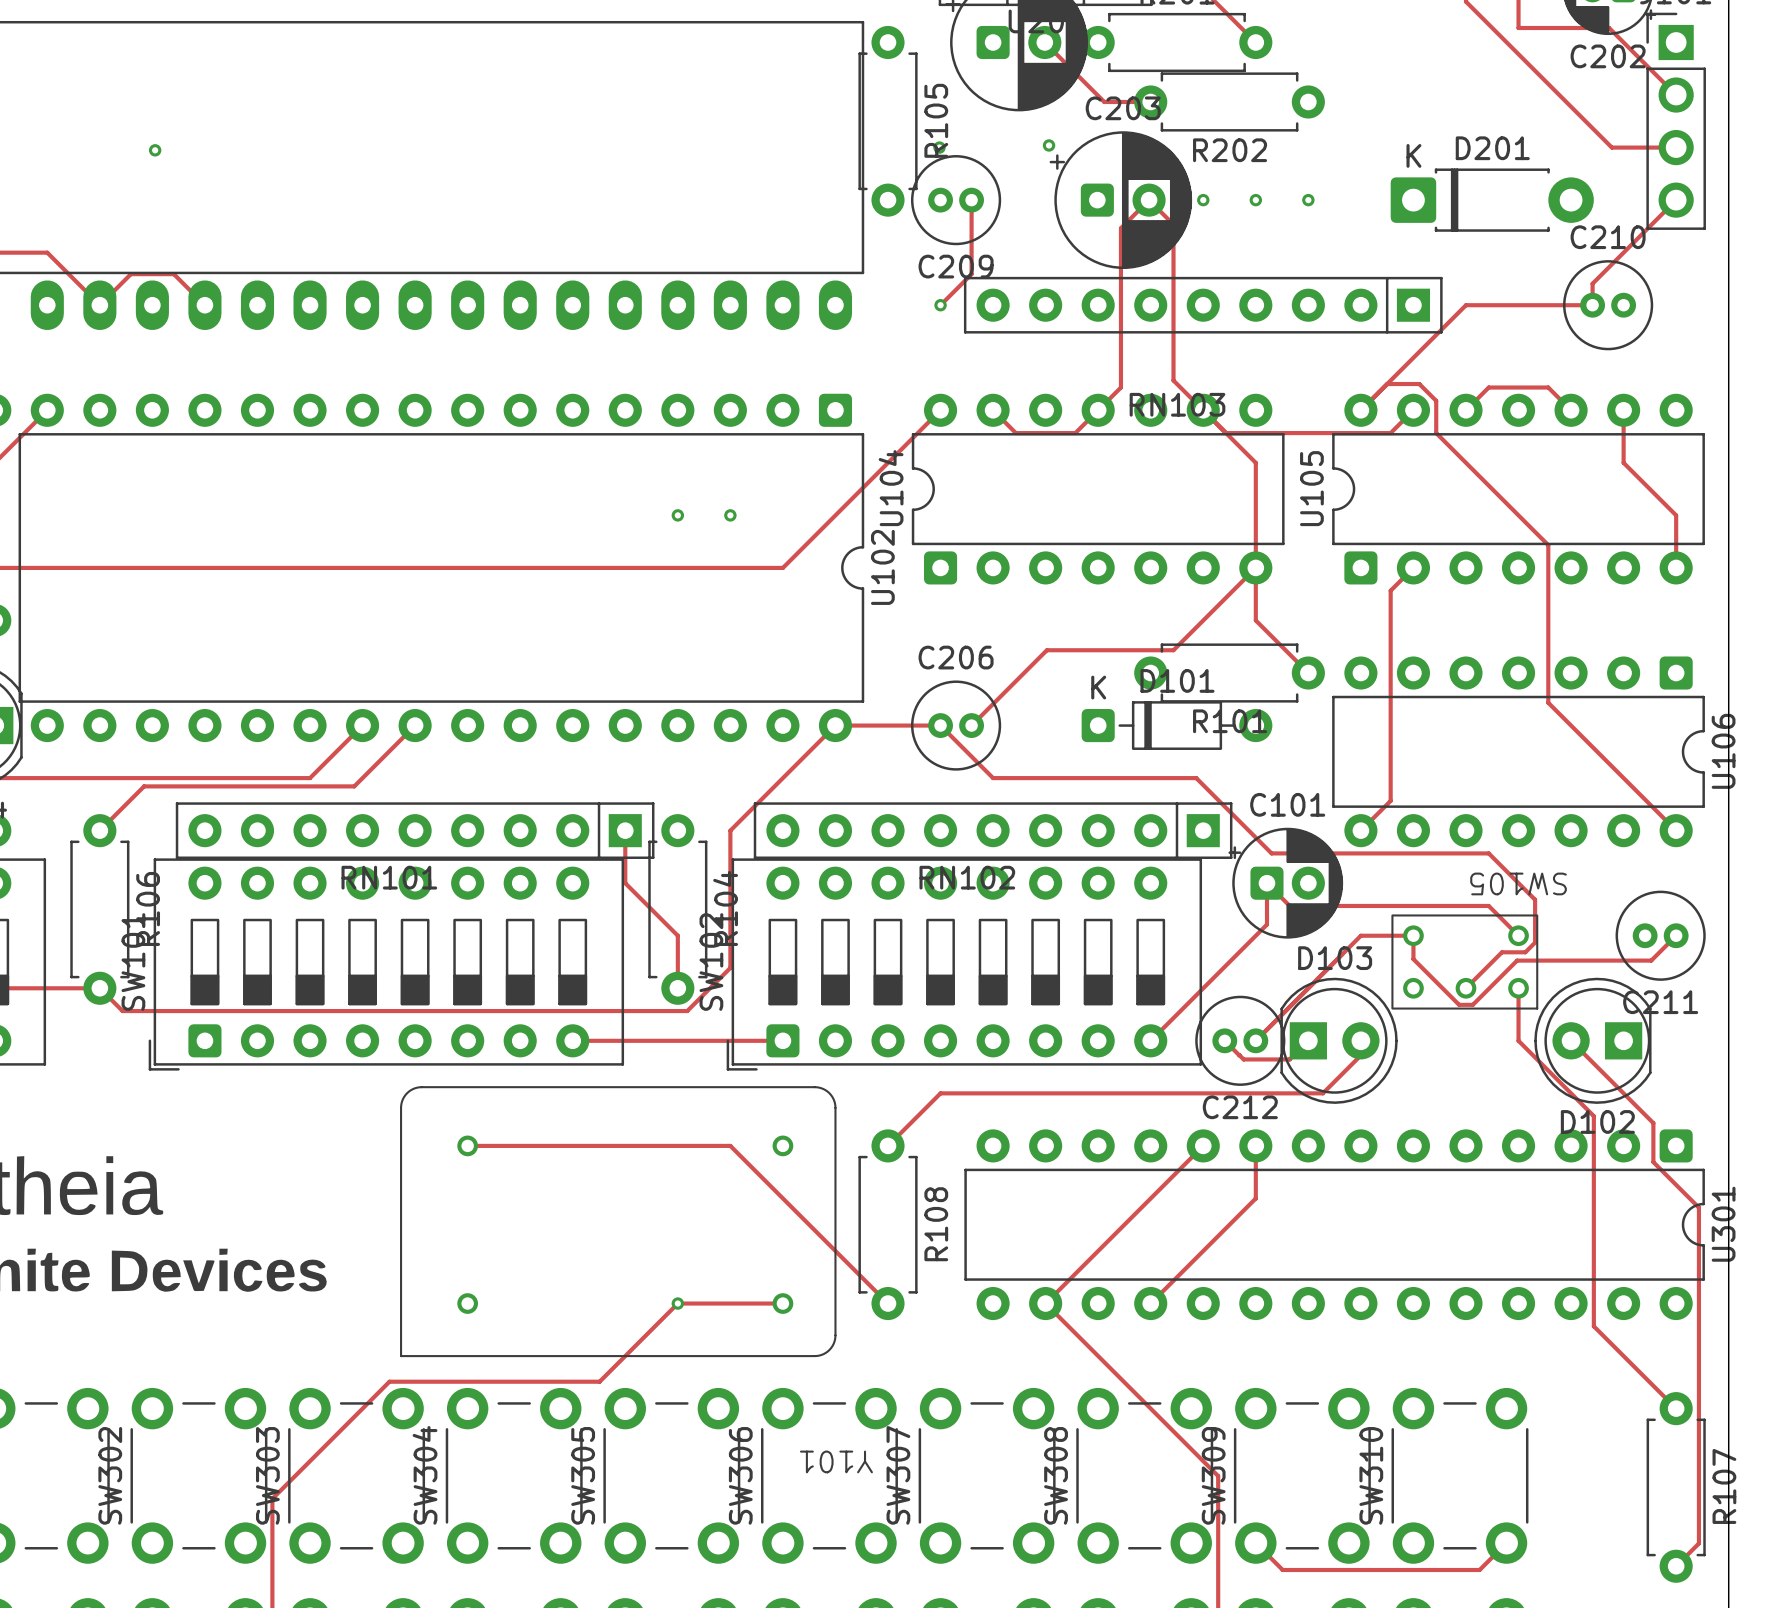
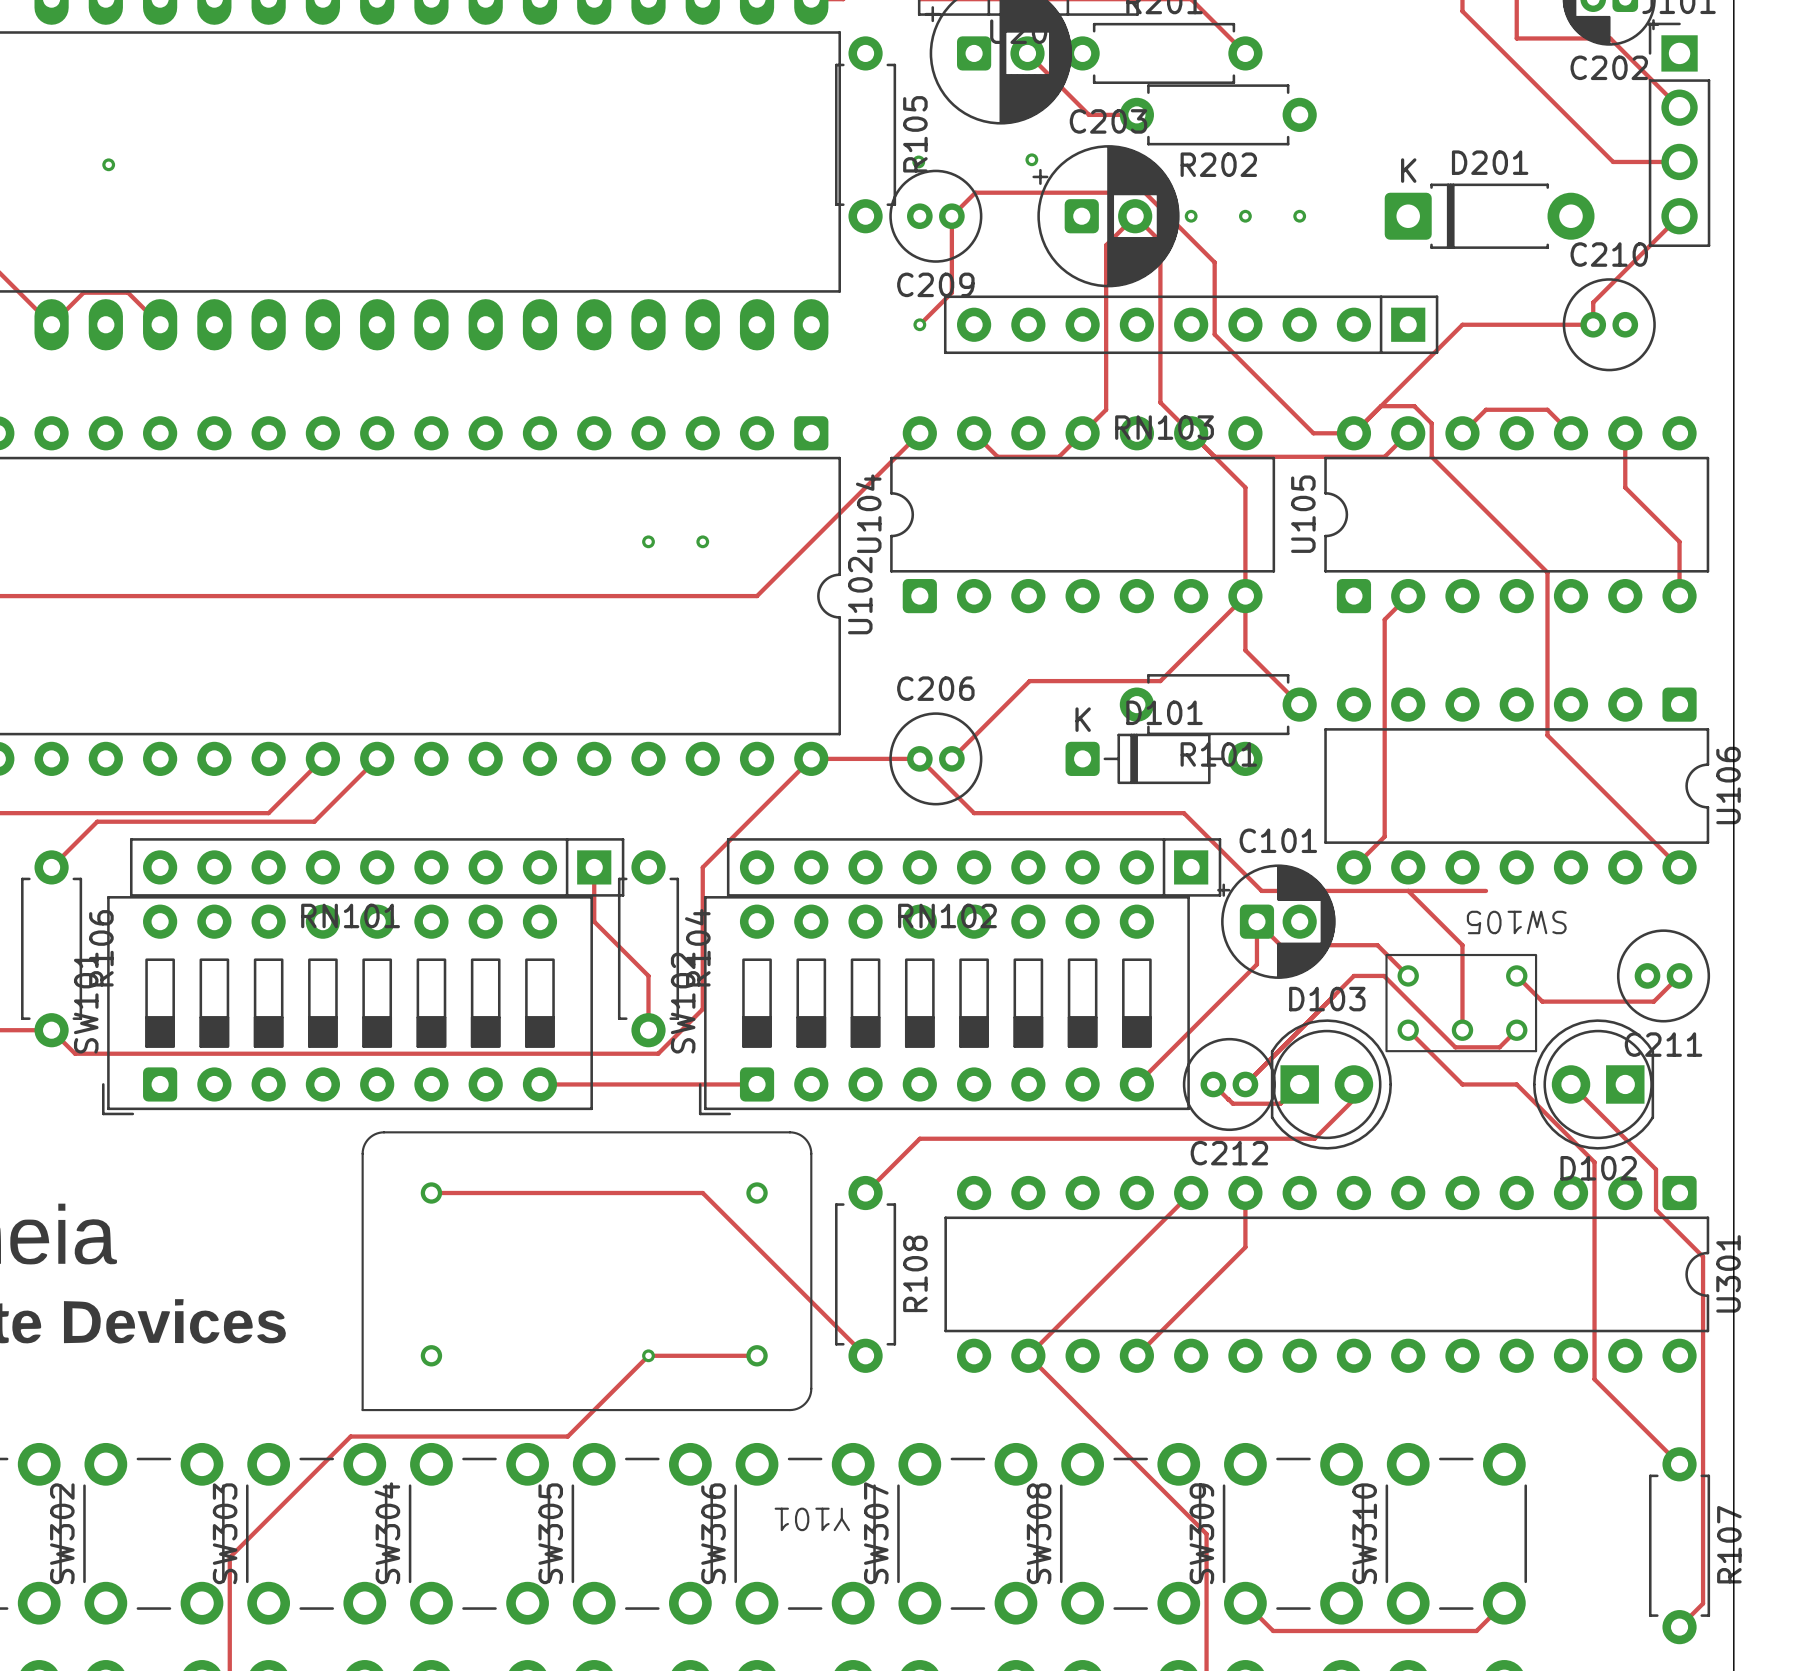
track: none -> (951, 216) (975, 192) (1144, 192) (1214, 262) (1214, 334) (1313, 433) (1353, 433)
track: (1488, 853) (1535, 899) (1535, 942) (1525, 952) (1501, 952) (1465, 988) -> (1408, 890) (1462, 945) (1462, 1030)
track: (1383, 905) (1488, 905) (1518, 935) -> (1377, 945) (1408, 975)
track: (1390, 935) (1413, 935) (1413, 959) -> (1384, 975) (1408, 1000)
track: none -> (1516, 975) (1542, 1001)
track: (1543, 960) (1517, 960) (1472, 1004) -> (1516, 1030) (1499, 1047) (1469, 1047)
track: (1518, 988) (1518, 1040) -> (1408, 1030) (1462, 1084) (1516, 1084)

